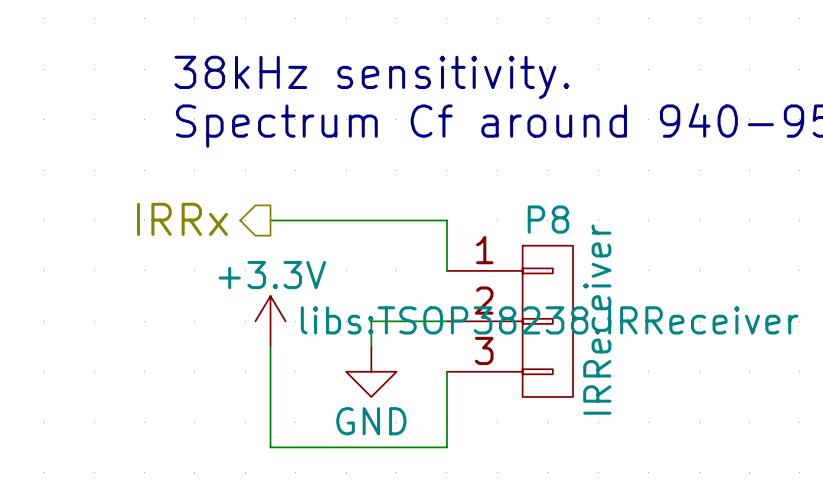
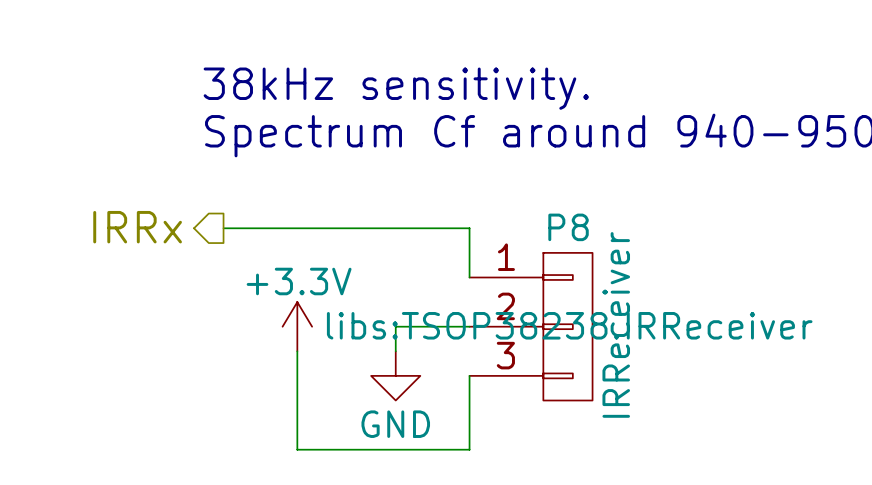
hierarchical label position: IRRx (182, 219) -> IRRx (137, 227)
wire: none -> (223, 228) (297, 228)

